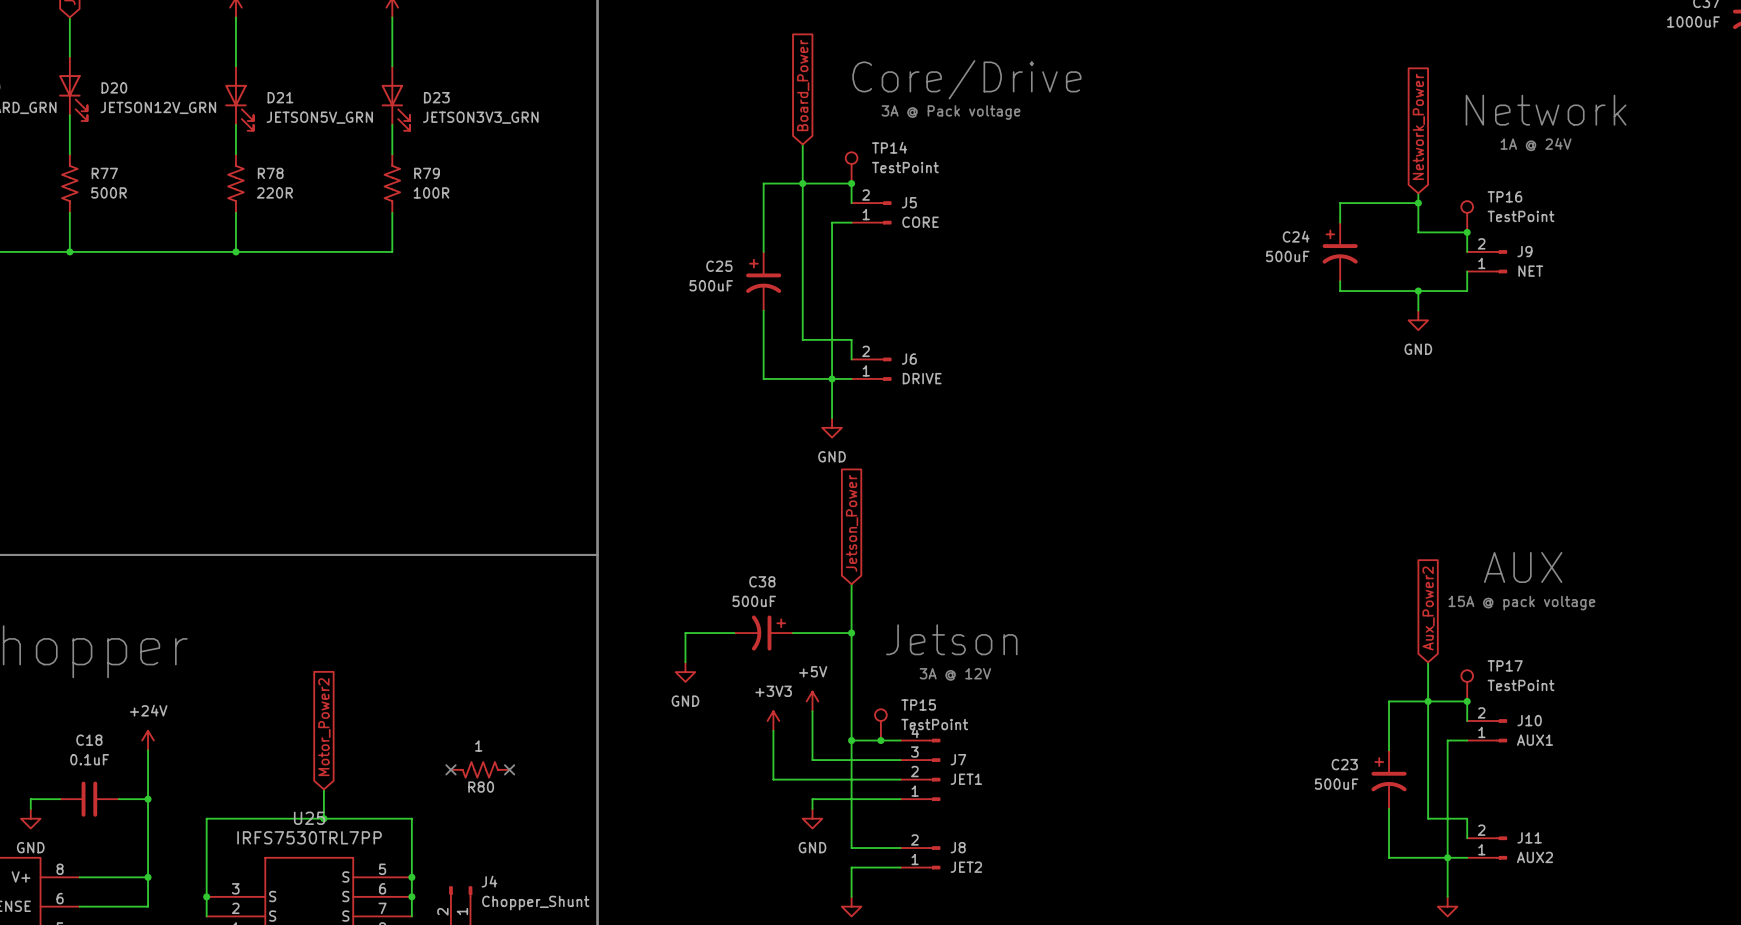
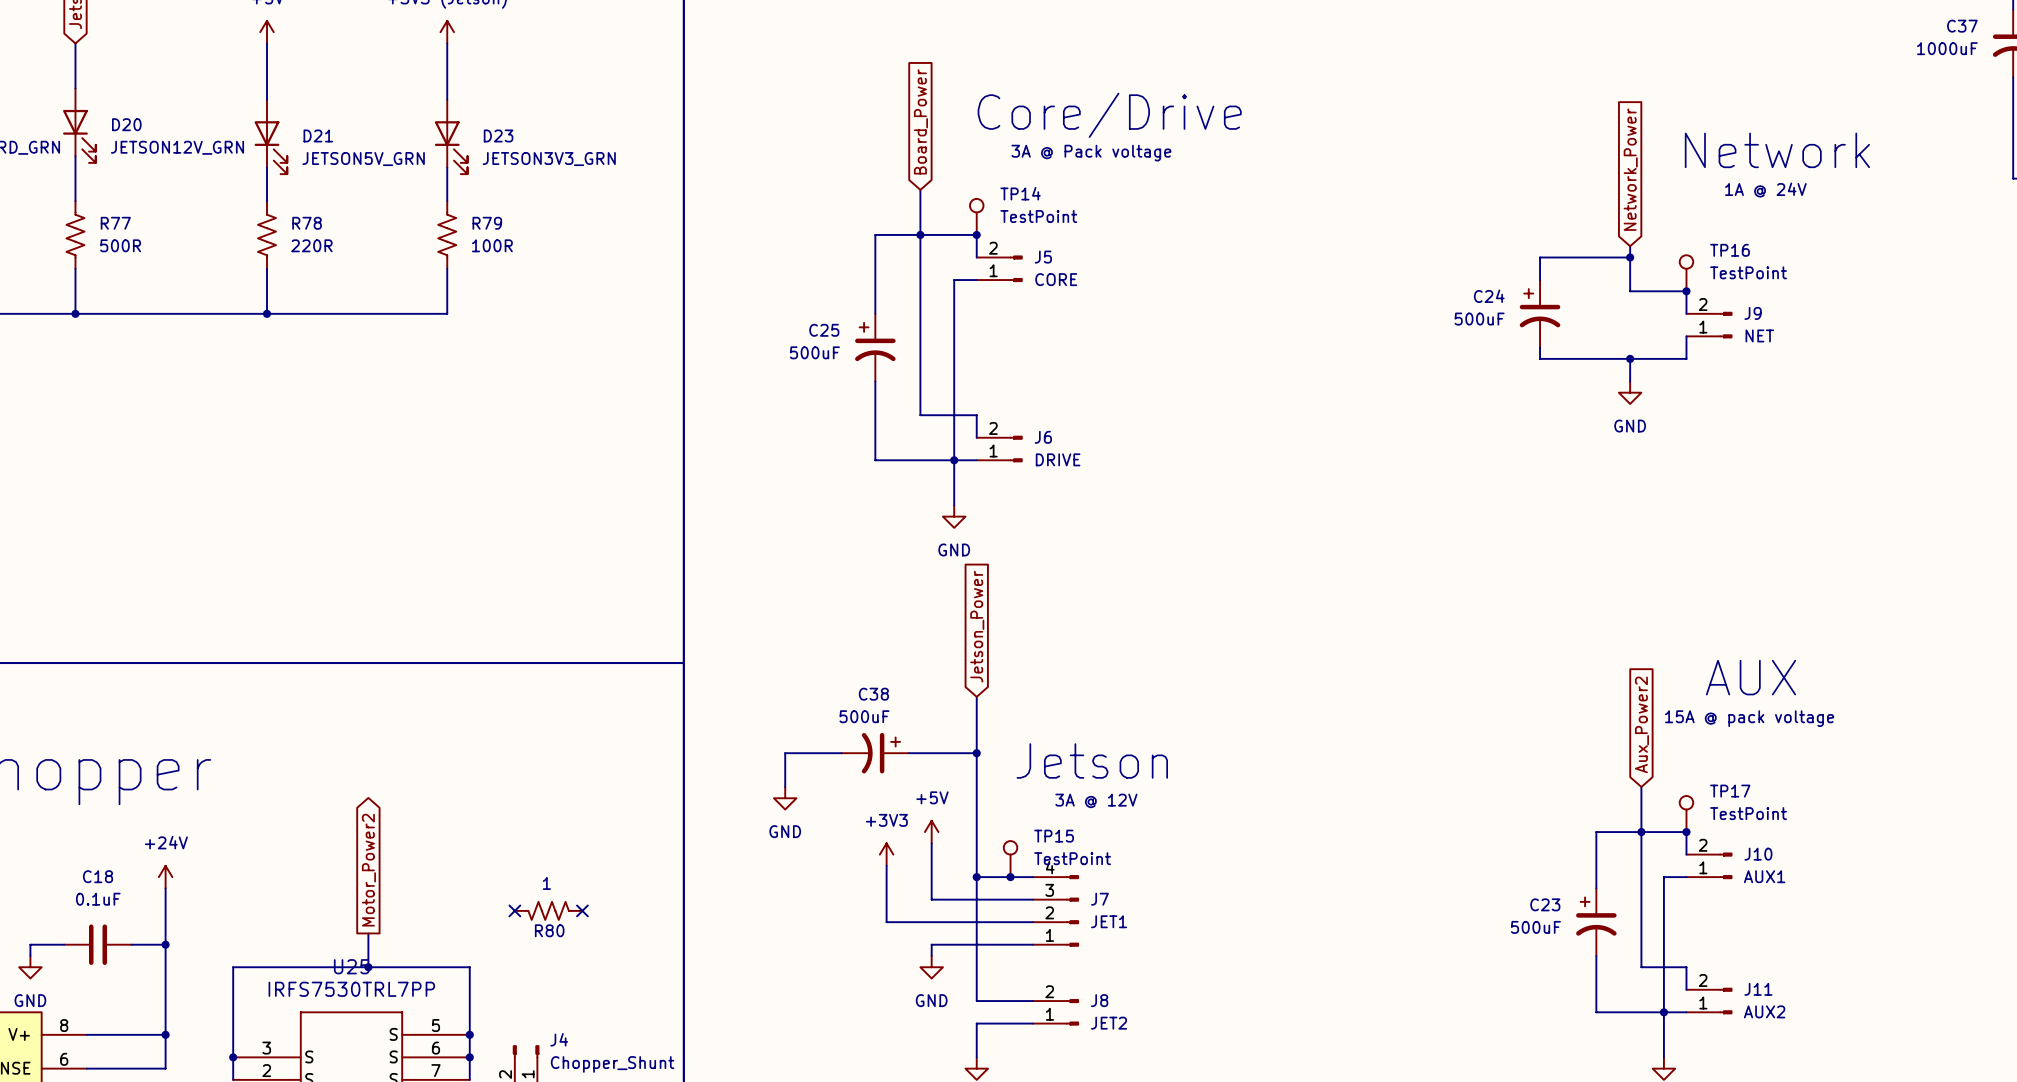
global label shape: input (324, 727) -> output (368, 870)

